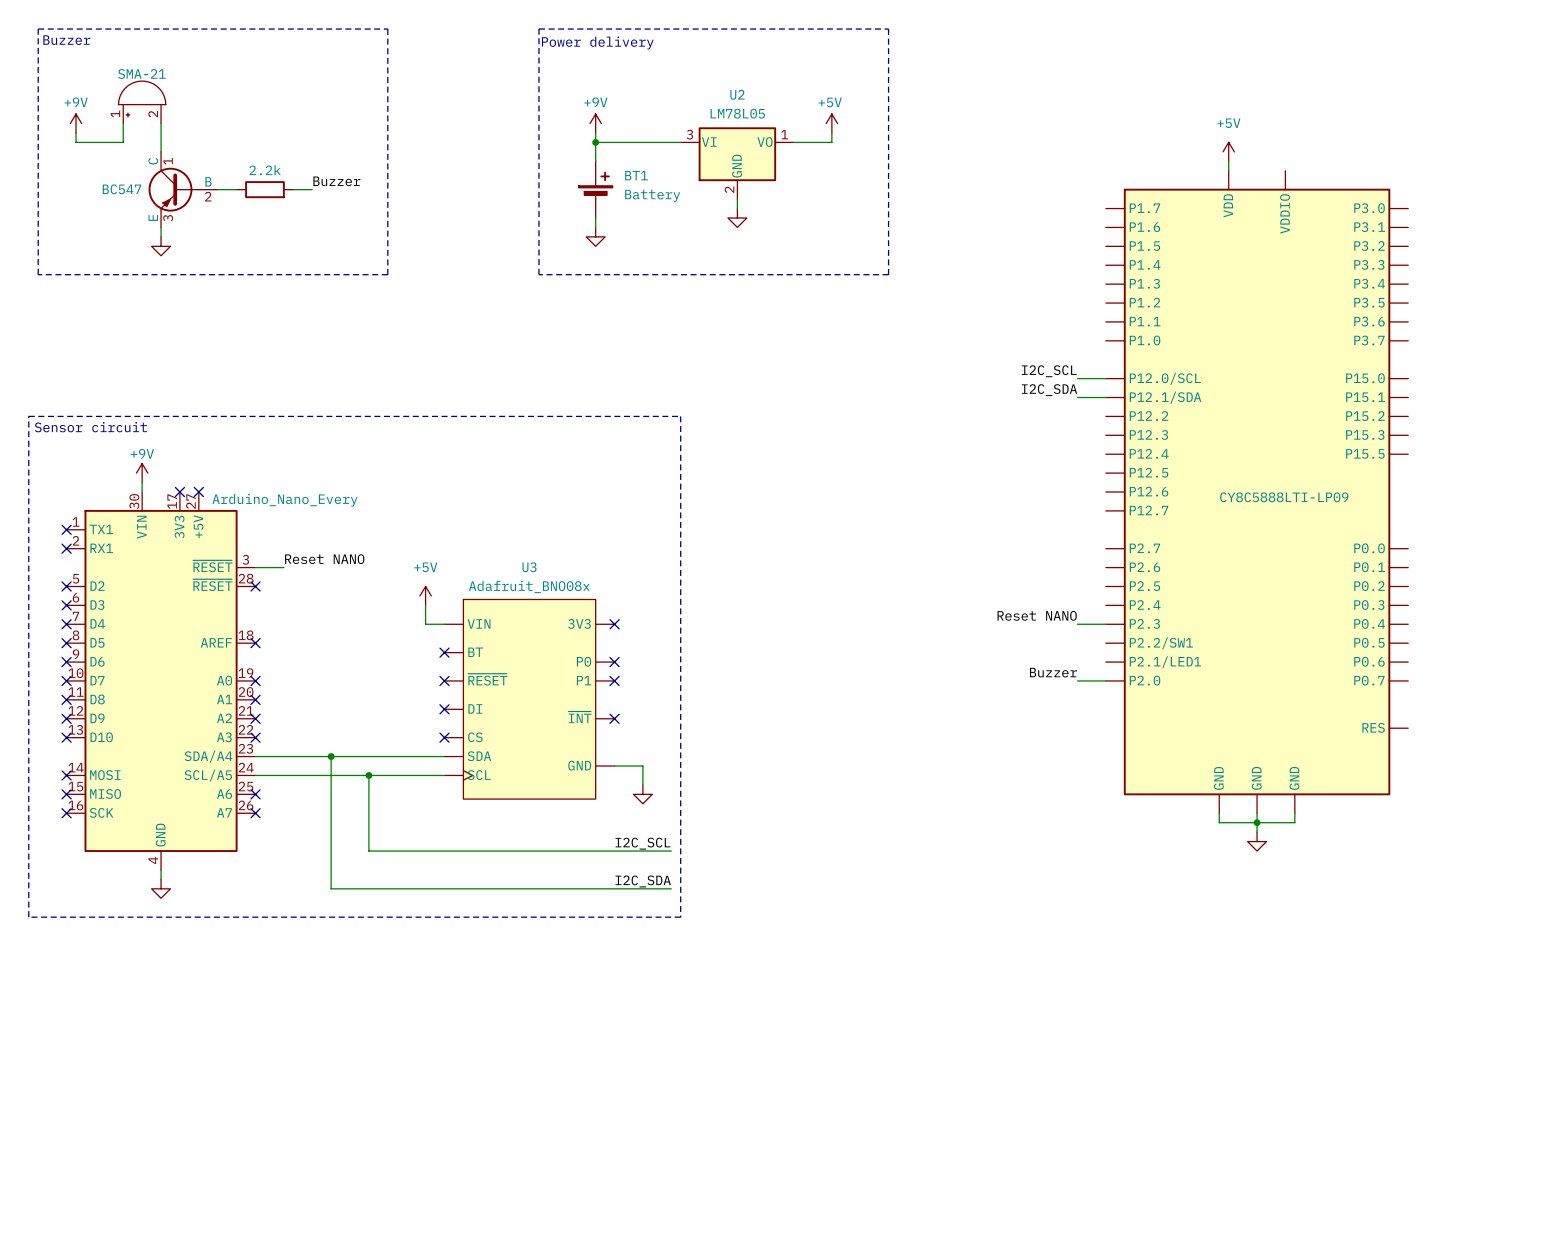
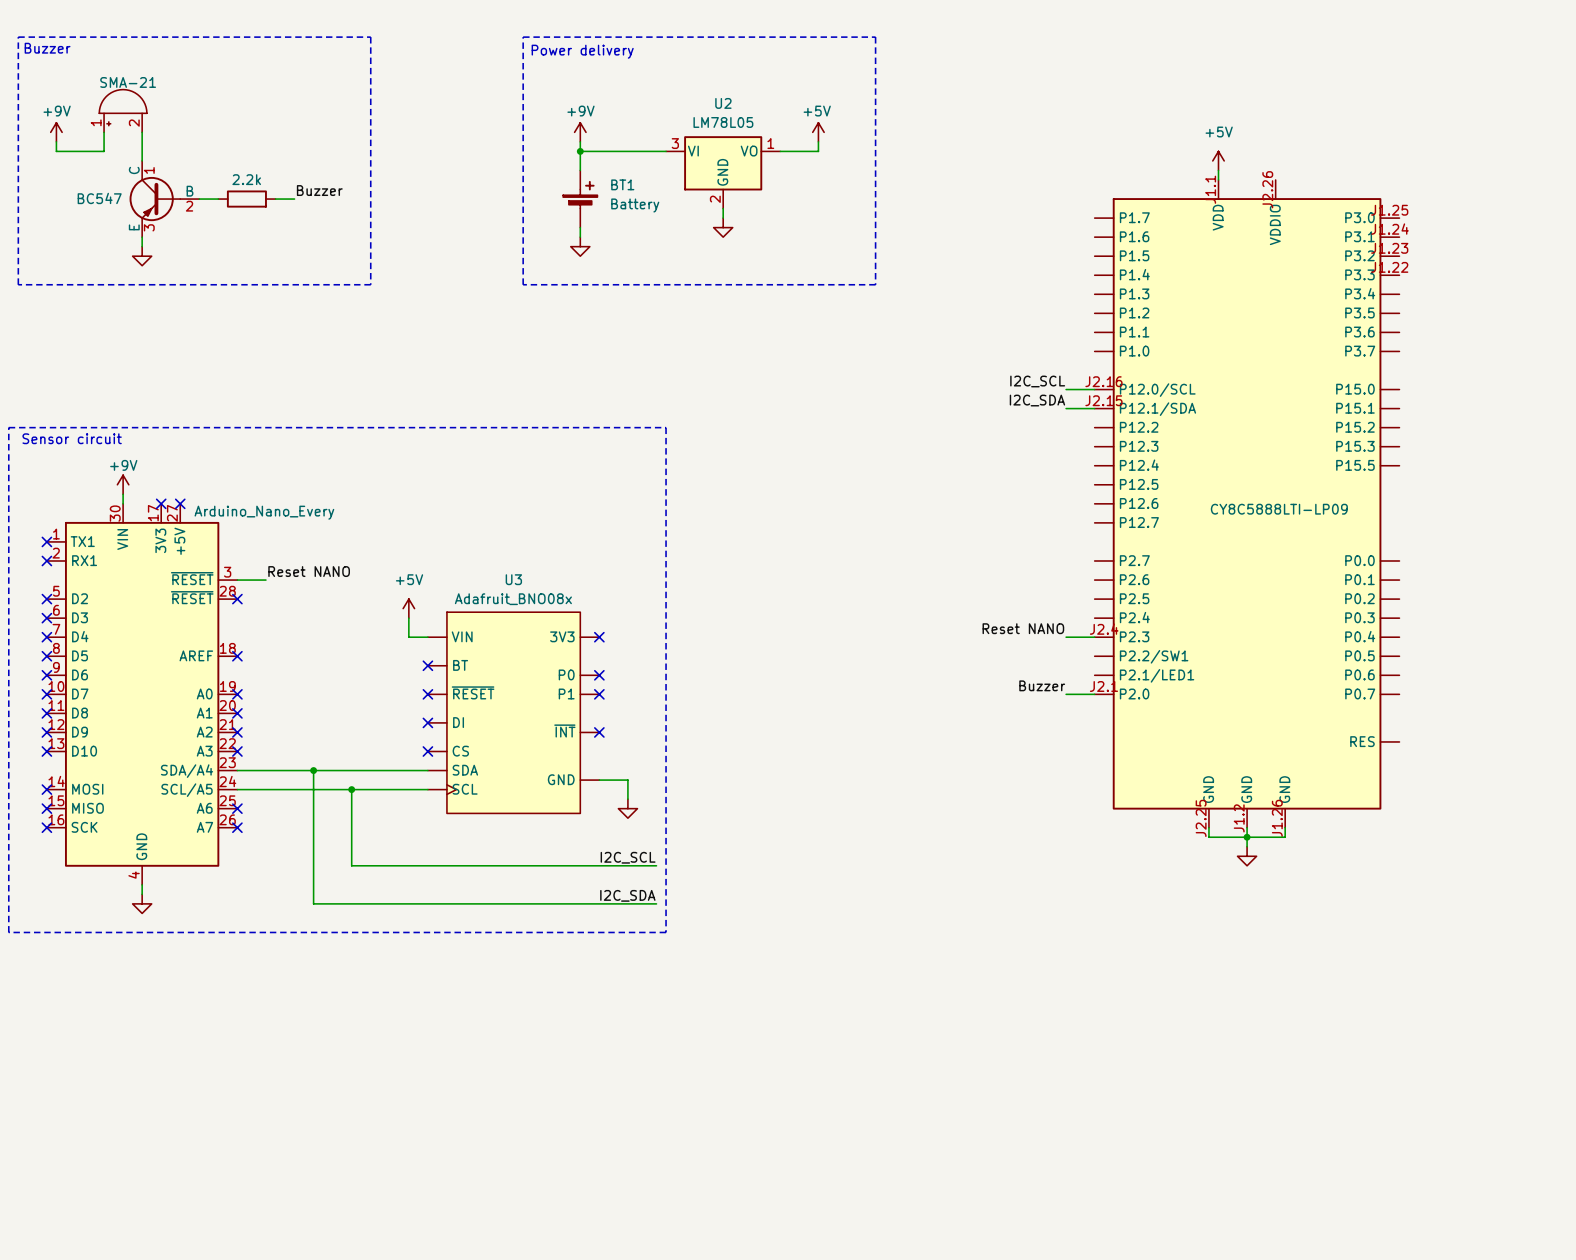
part symbol: [1105, 170, 1409, 814] -> [1094, 179, 1400, 828]

